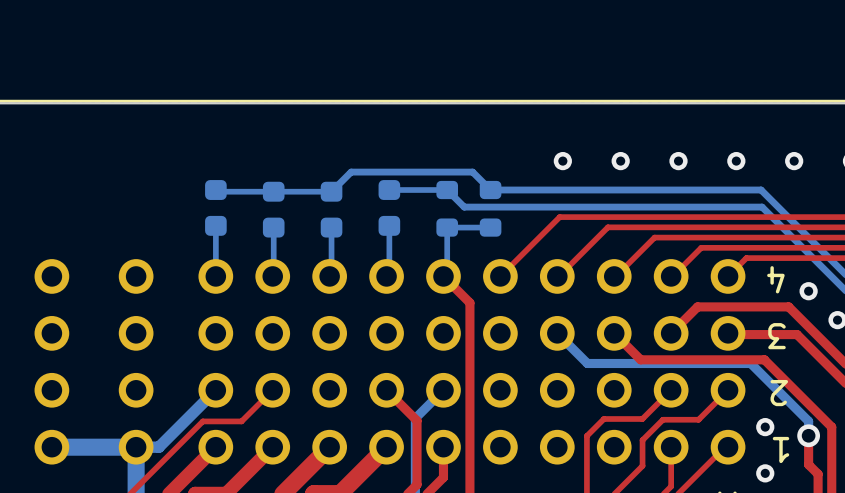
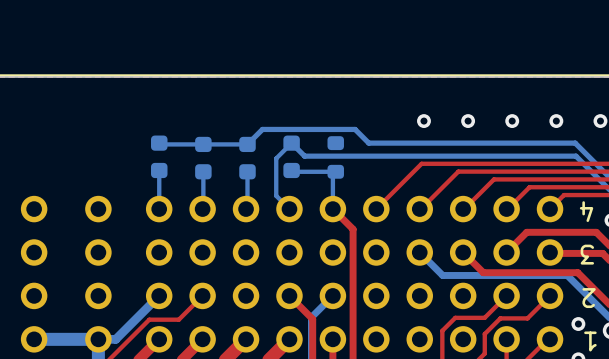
bottom track: (389, 190) (447, 190) (464, 207) -> (289, 209) (276, 195) (276, 158) (291, 143) (304, 156) (348, 156)
part: (490, 208) -> none
bottom track: (389, 225) (389, 273) -> none
bottom track: none -> (291, 171) (335, 171) (332, 174) (332, 209)
bottom track: (490, 227) (447, 227) (447, 272) -> none

